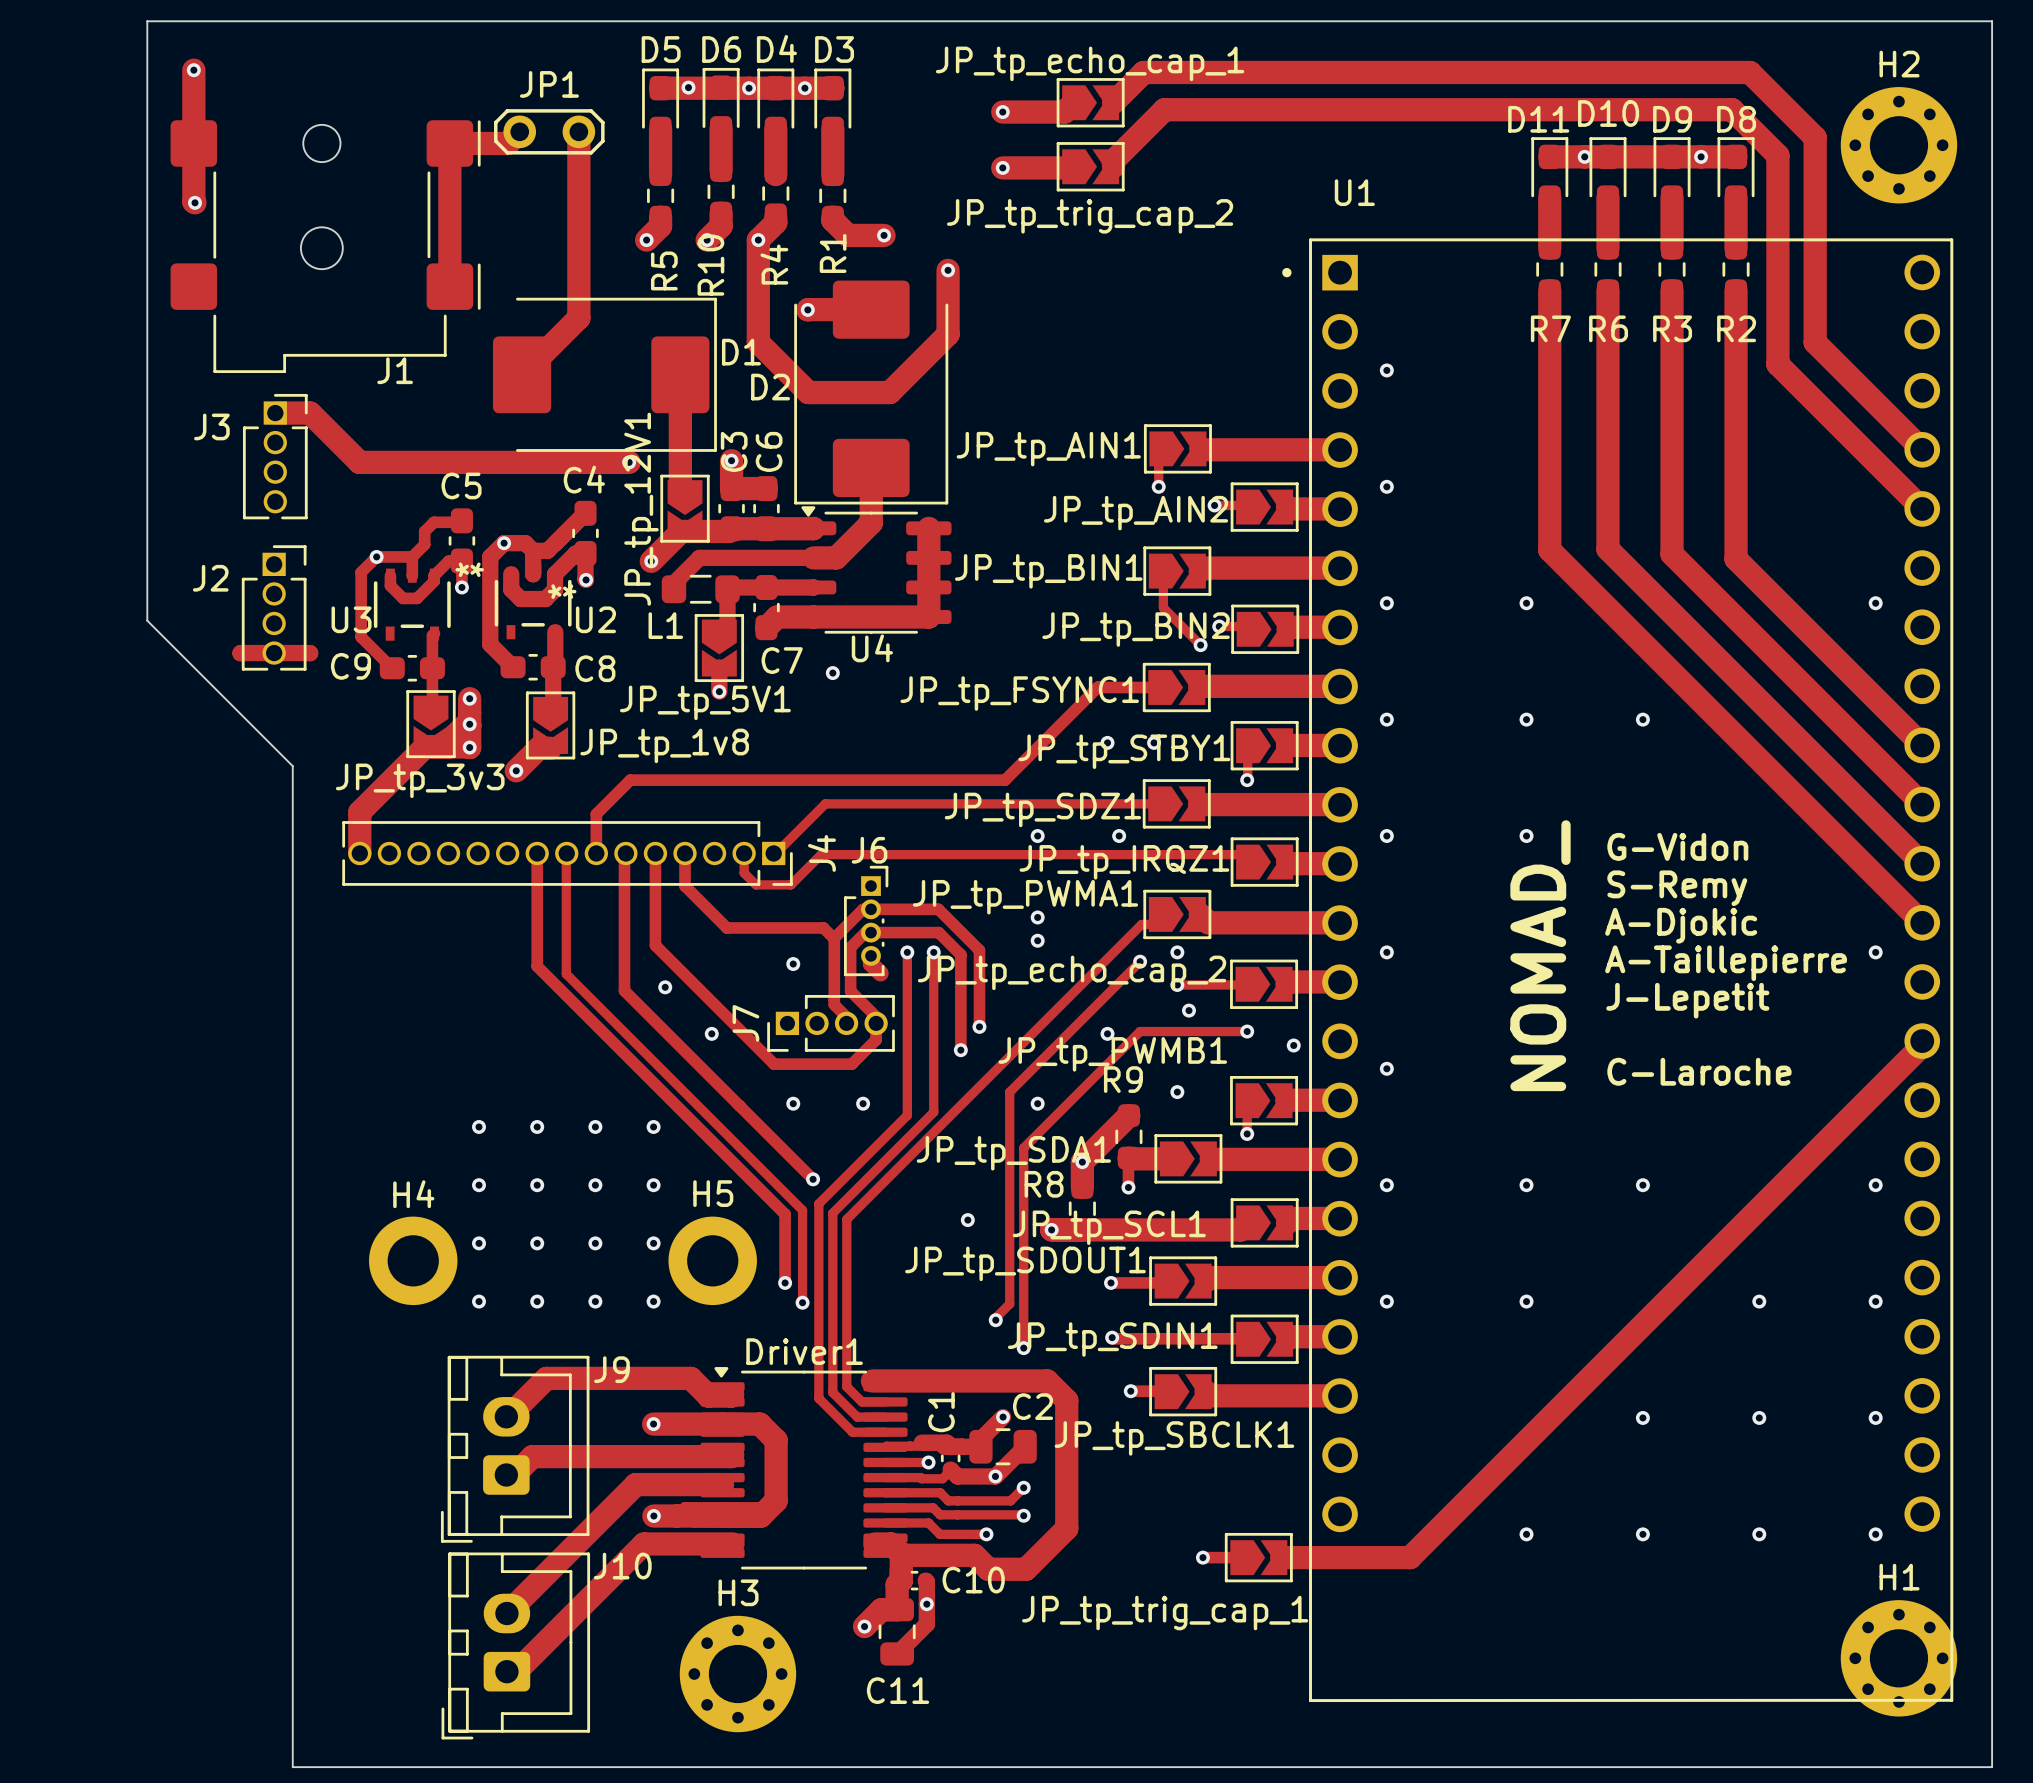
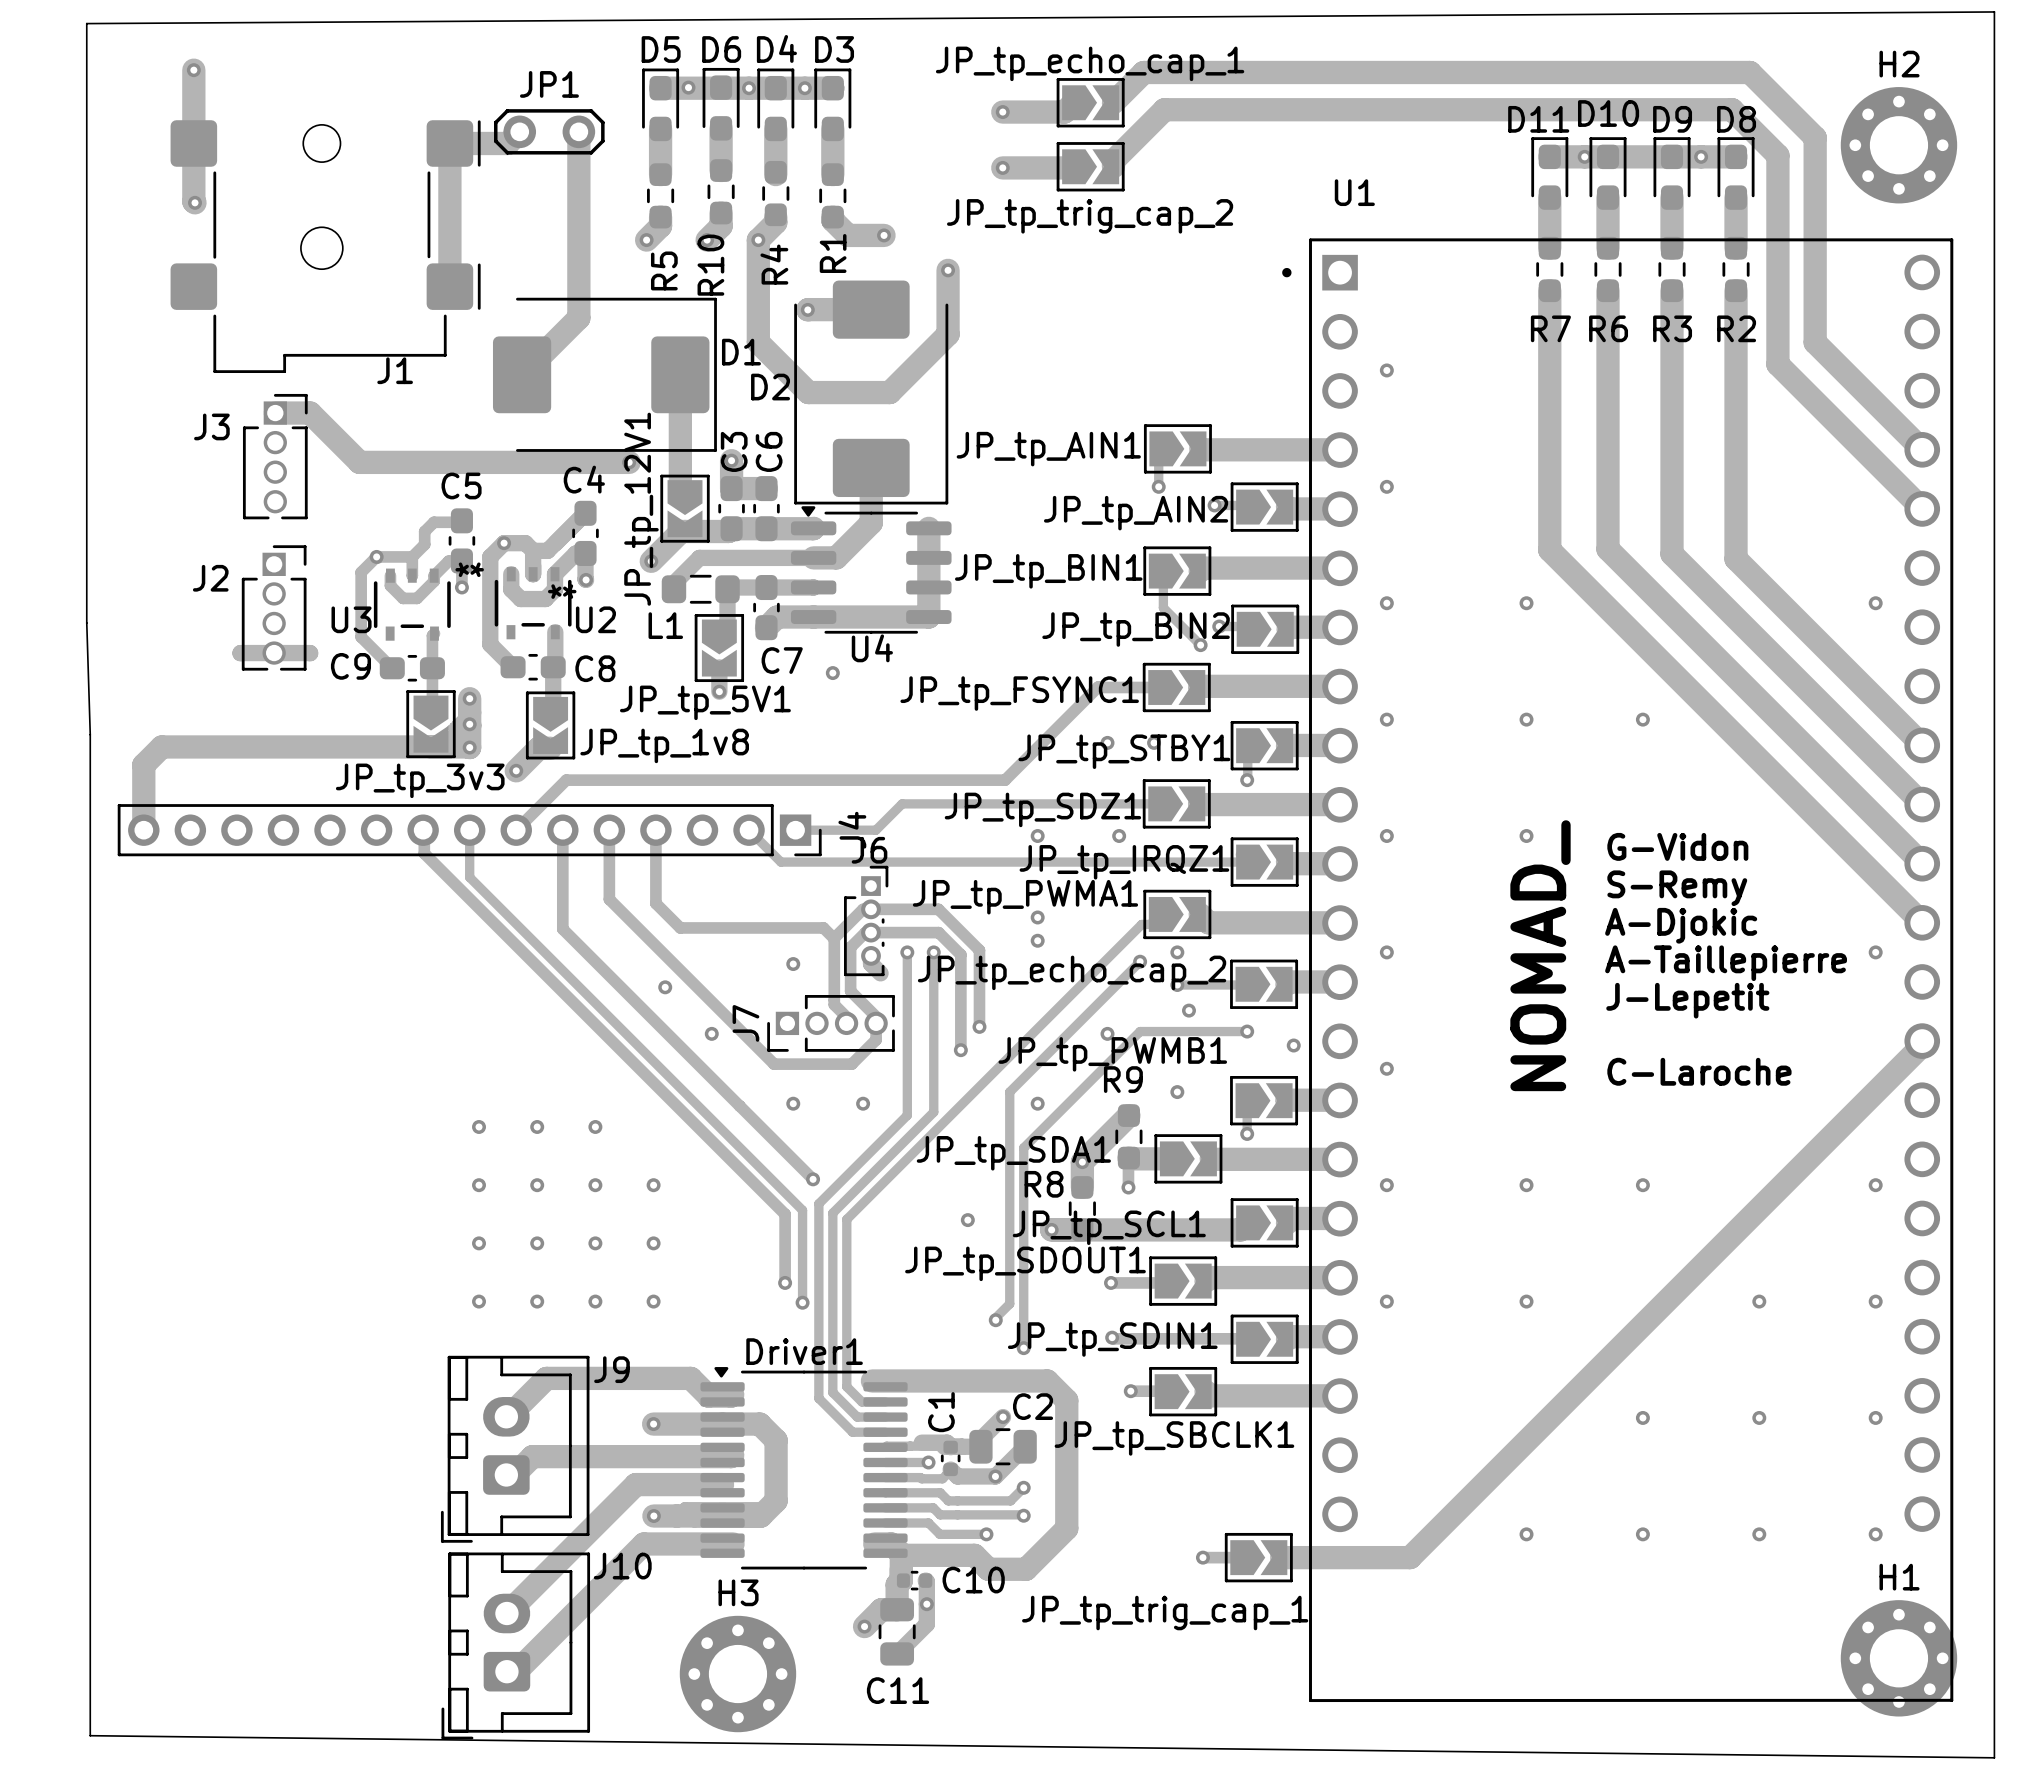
board edge: (147, 21) (147, 620) (292, 766) (292, 1767) (1992, 1767) (1992, 21) (147, 21) -> (1994, 11) (86, 23) (86, 623) (90, 734) (90, 1735) (1994, 1757) (1994, 11)
track: (425, 746) (359, 812) (359, 853) -> (425, 746) (161, 746) (143, 765) (143, 830)
track: (630, 780) (596, 814) (596, 849) -> (630, 780) (566, 780) (516, 830)
track: (902, 803) (825, 803) (777, 851) (771, 851) -> (902, 803) (875, 830) (795, 830) (796, 829)
J4 footprint: [342, 821, 793, 886] -> [117, 804, 822, 857]
track: none -> (749, 830) (780, 862) (1247, 862)
track: (624, 852) (624, 990) -> (562, 830) (562, 929) (624, 990)
track: (537, 853) (537, 966) -> (423, 830) (424, 853) (537, 966)
track: (566, 853) (566, 974) -> (469, 830) (469, 877) (566, 974)
track: (655, 853) (655, 945) -> (609, 830) (609, 899) (655, 945)
track: (685, 853) (685, 886) (726, 927) -> (655, 830) (655, 903) (680, 927) (726, 927)
track: (744, 853) (744, 873) (756, 884) (790, 884) (821, 854) (1240, 854) -> none
J4 name position: J4 (821, 853) -> J4 (852, 830)
via: (653, 1126) -> none
H4: (413, 1260) -> none
H5: (712, 1260) -> none

